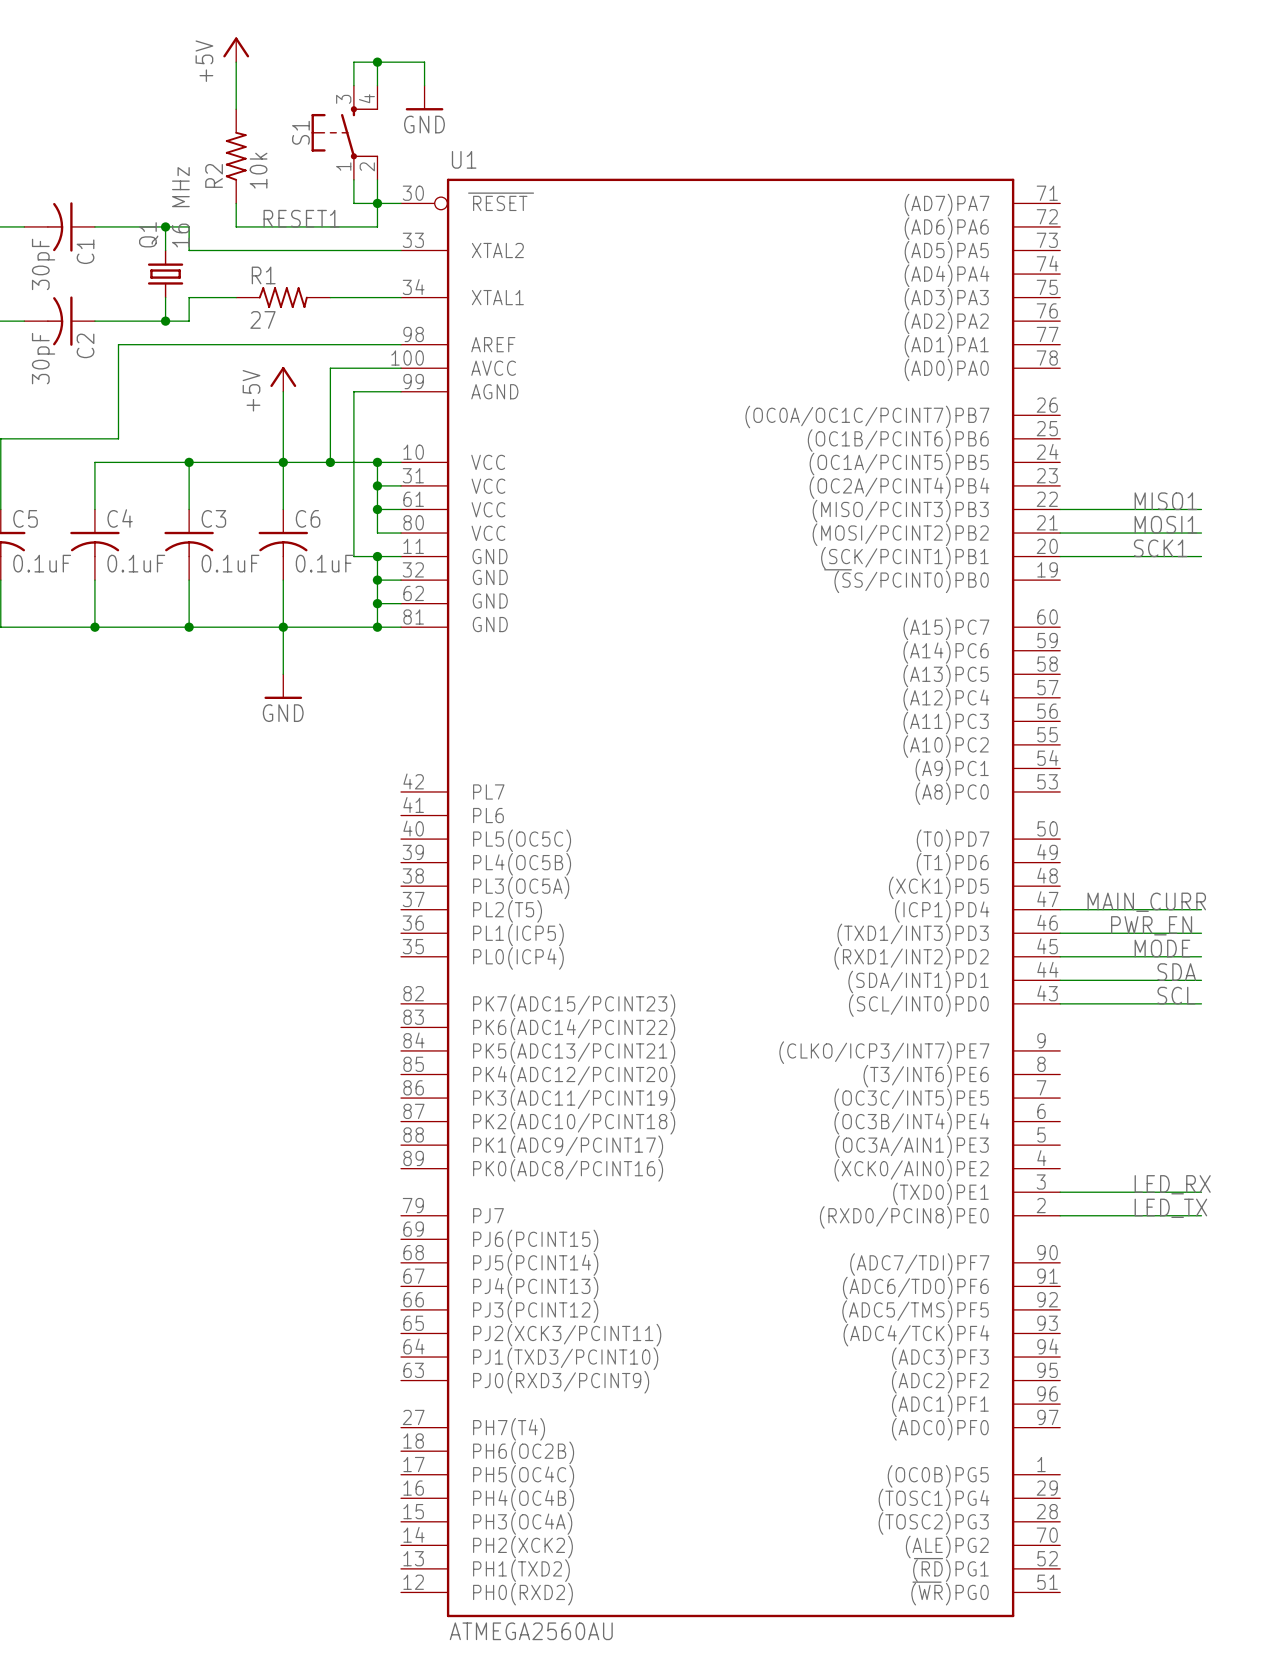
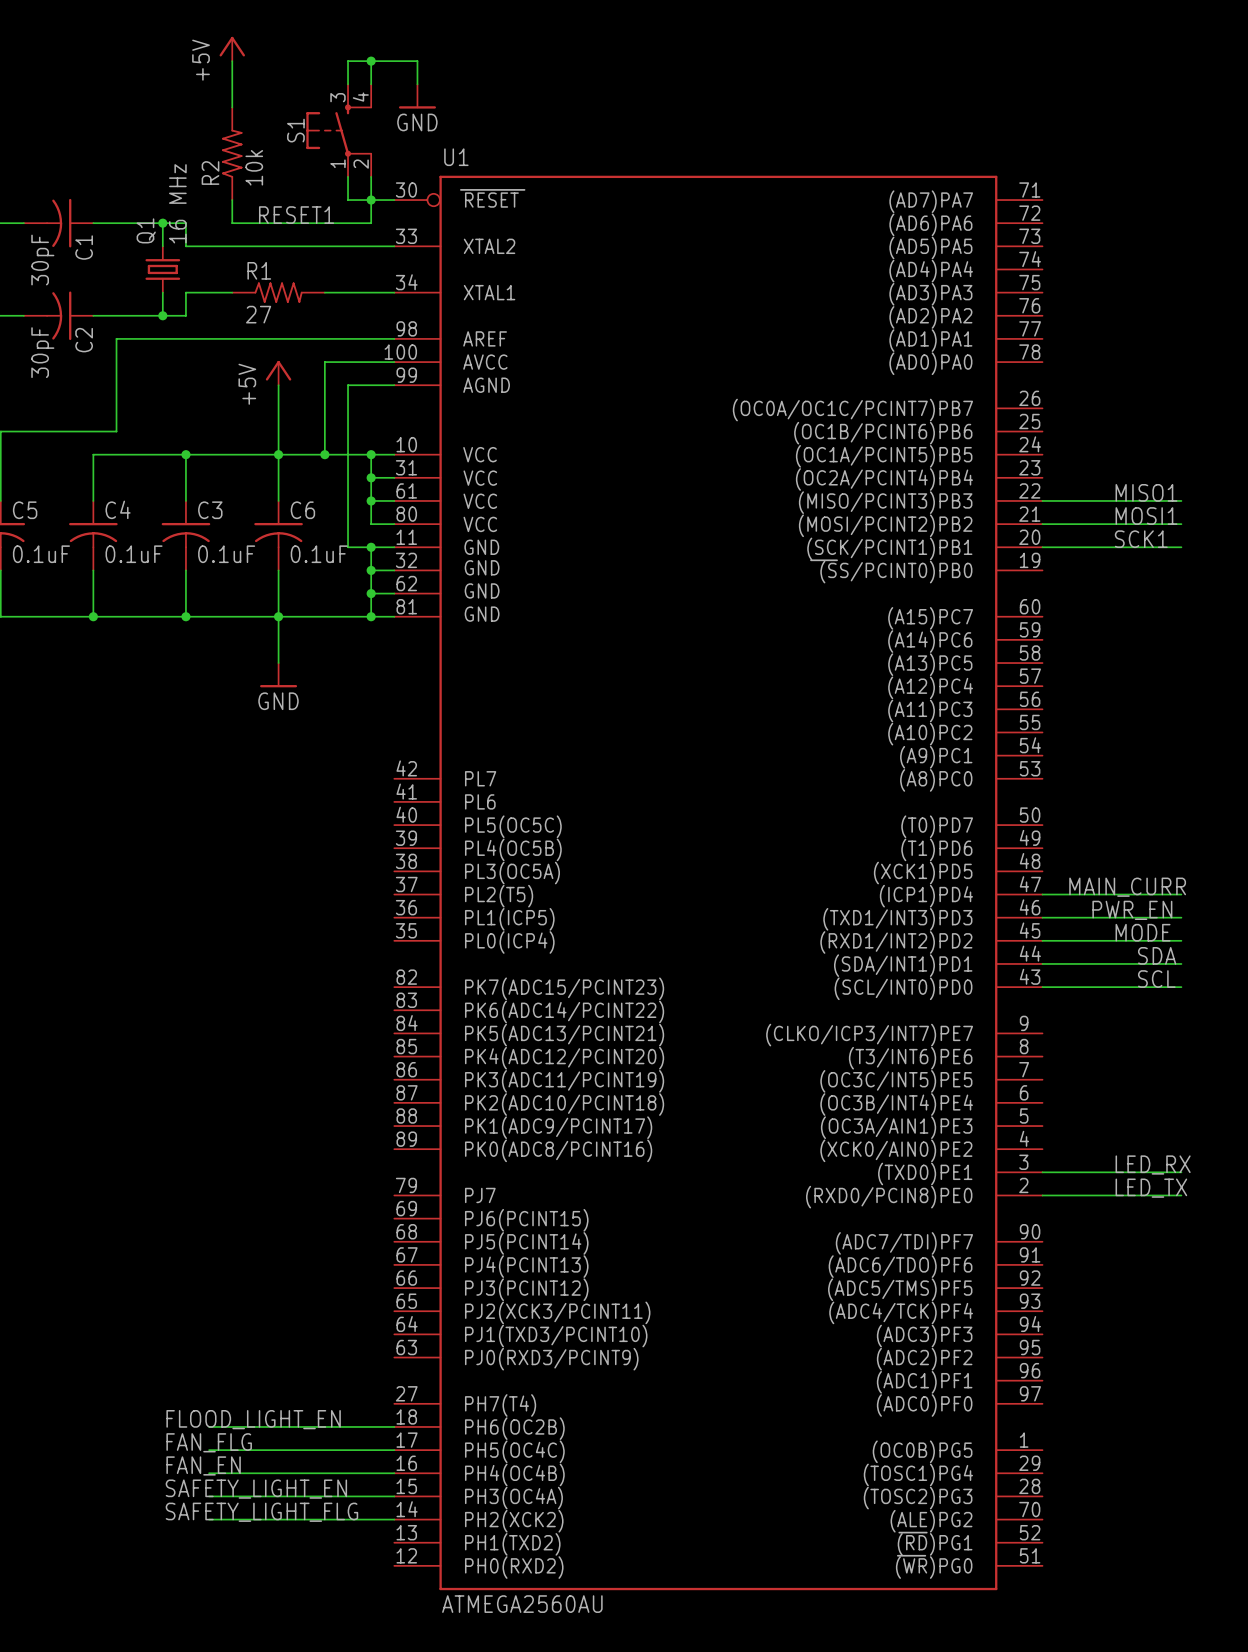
label: none -> FLOOD_LIGHT_EN (253, 1419)
wire: none -> (209, 1426) (394, 1426)
label: none -> FAN_FLG (209, 1442)
wire: none -> (209, 1450) (394, 1450)
label: none -> FAN_EN (203, 1465)
wire: none -> (209, 1473) (394, 1473)
label: none -> SAFETY_LIGHT_EN (256, 1489)
wire: none -> (209, 1496) (394, 1496)
label: none -> SAFETY_LIGHT_FLG (261, 1512)
wire: none -> (209, 1519) (394, 1519)

